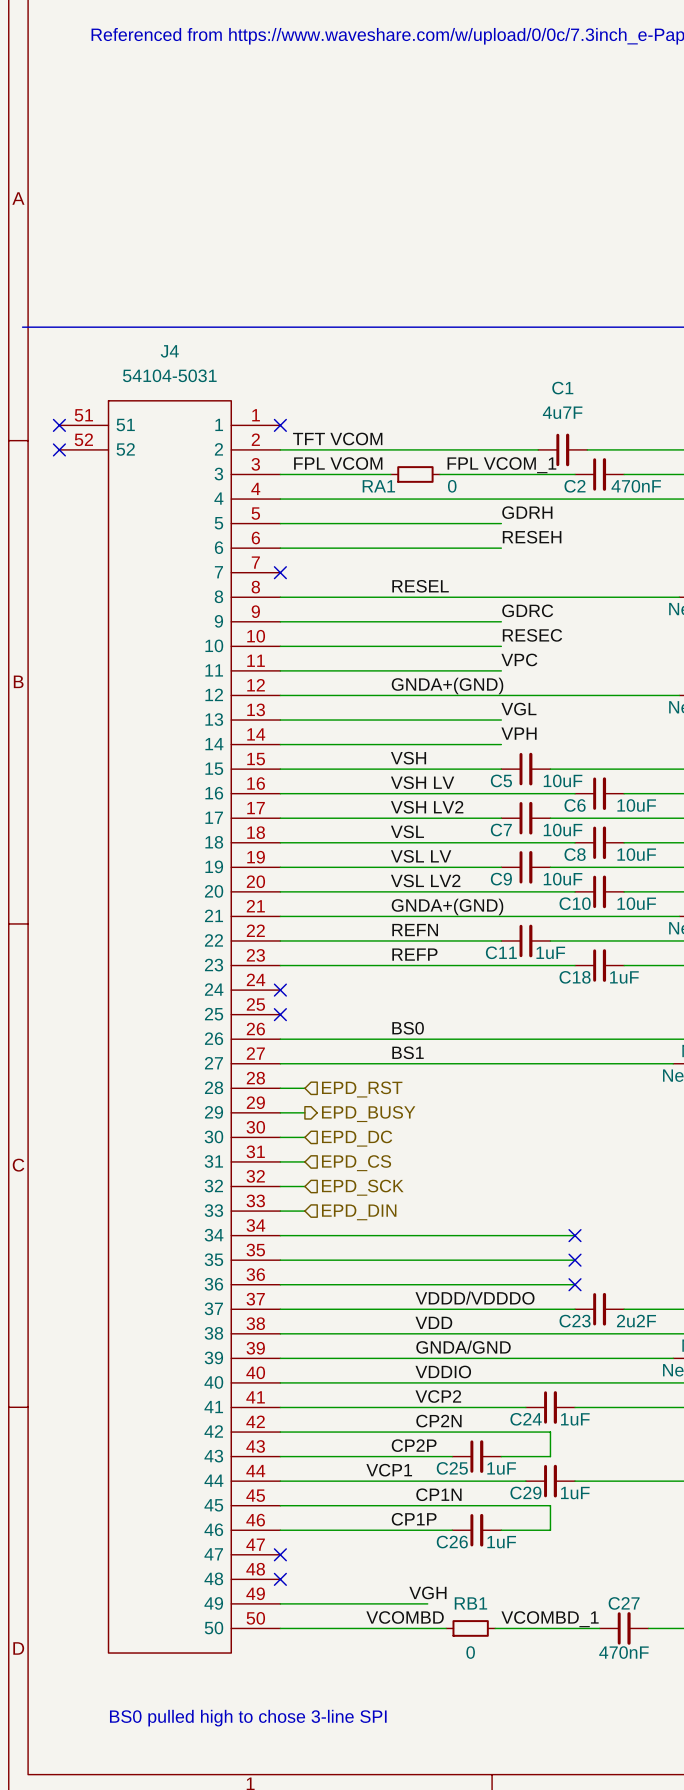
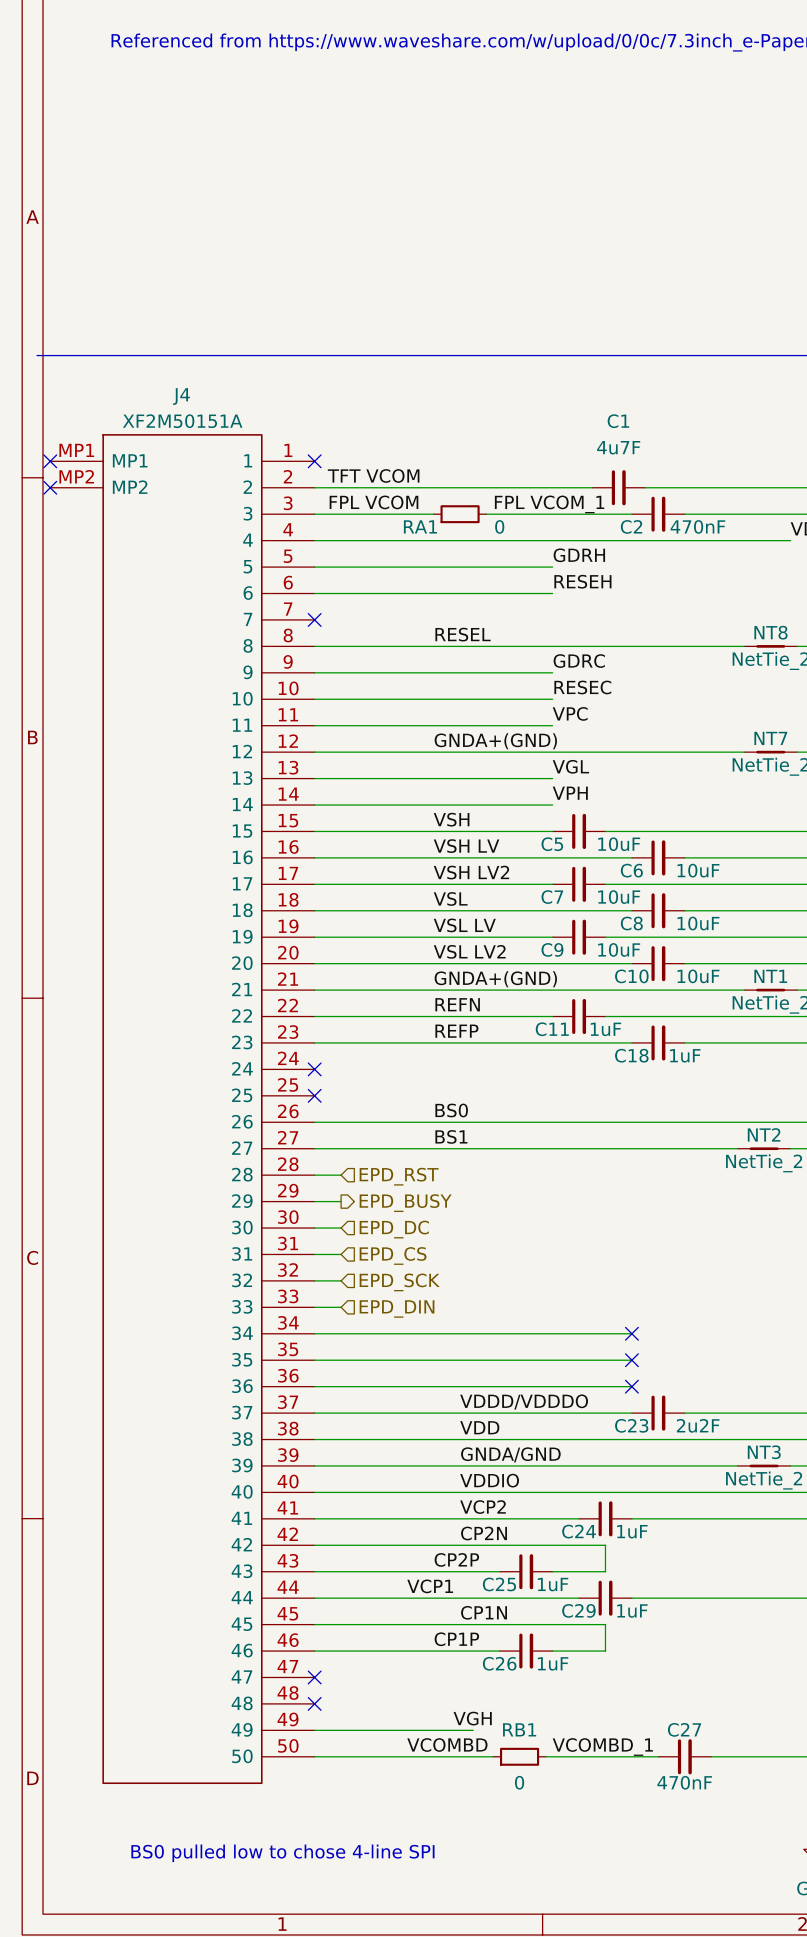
J4 value: 54104-5031 (169, 375) -> XF2M50151A (182, 421)
J4 symbol: [59, 400, 281, 1654] -> [50, 434, 315, 1785]
no-connect mark: none -> (50, 461)
no-connect mark: (59, 425) -> none
no-connect mark: none -> (50, 487)
no-connect mark: (59, 449) -> none
text: BS0 pulled high to chose 3-line SPI (248, 1718) -> BS0 pulled low to chose 4-line SPI (282, 1853)

